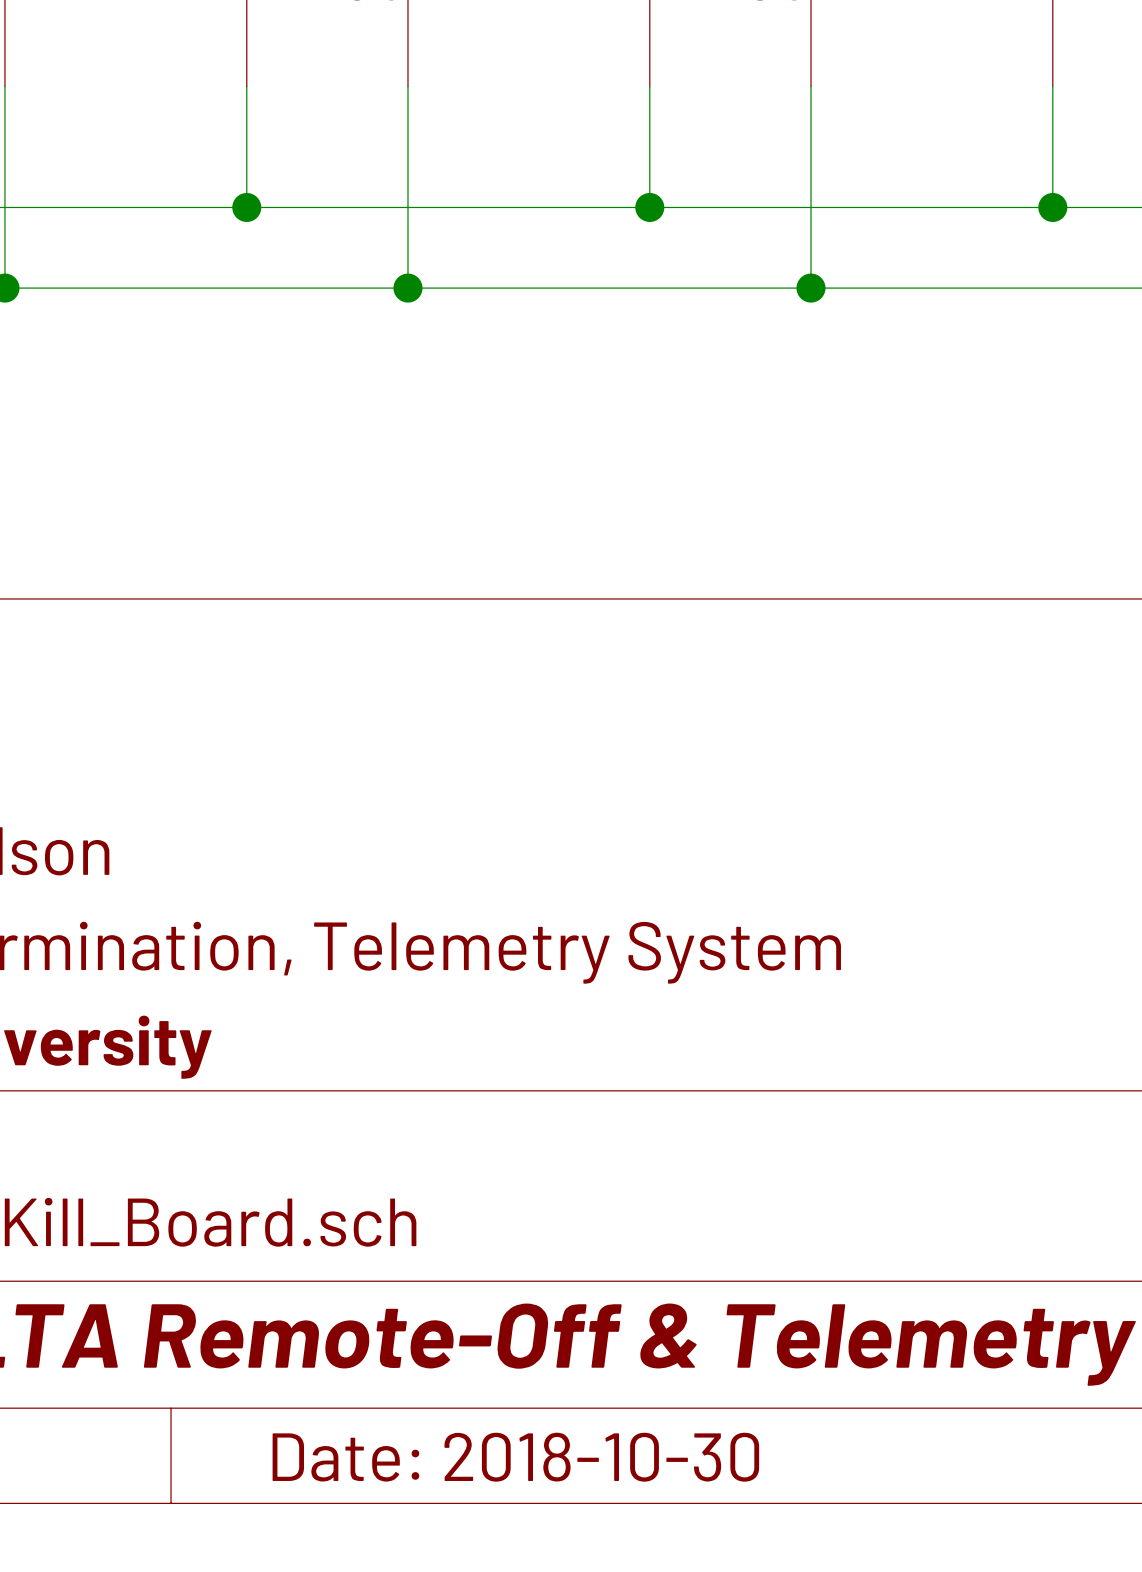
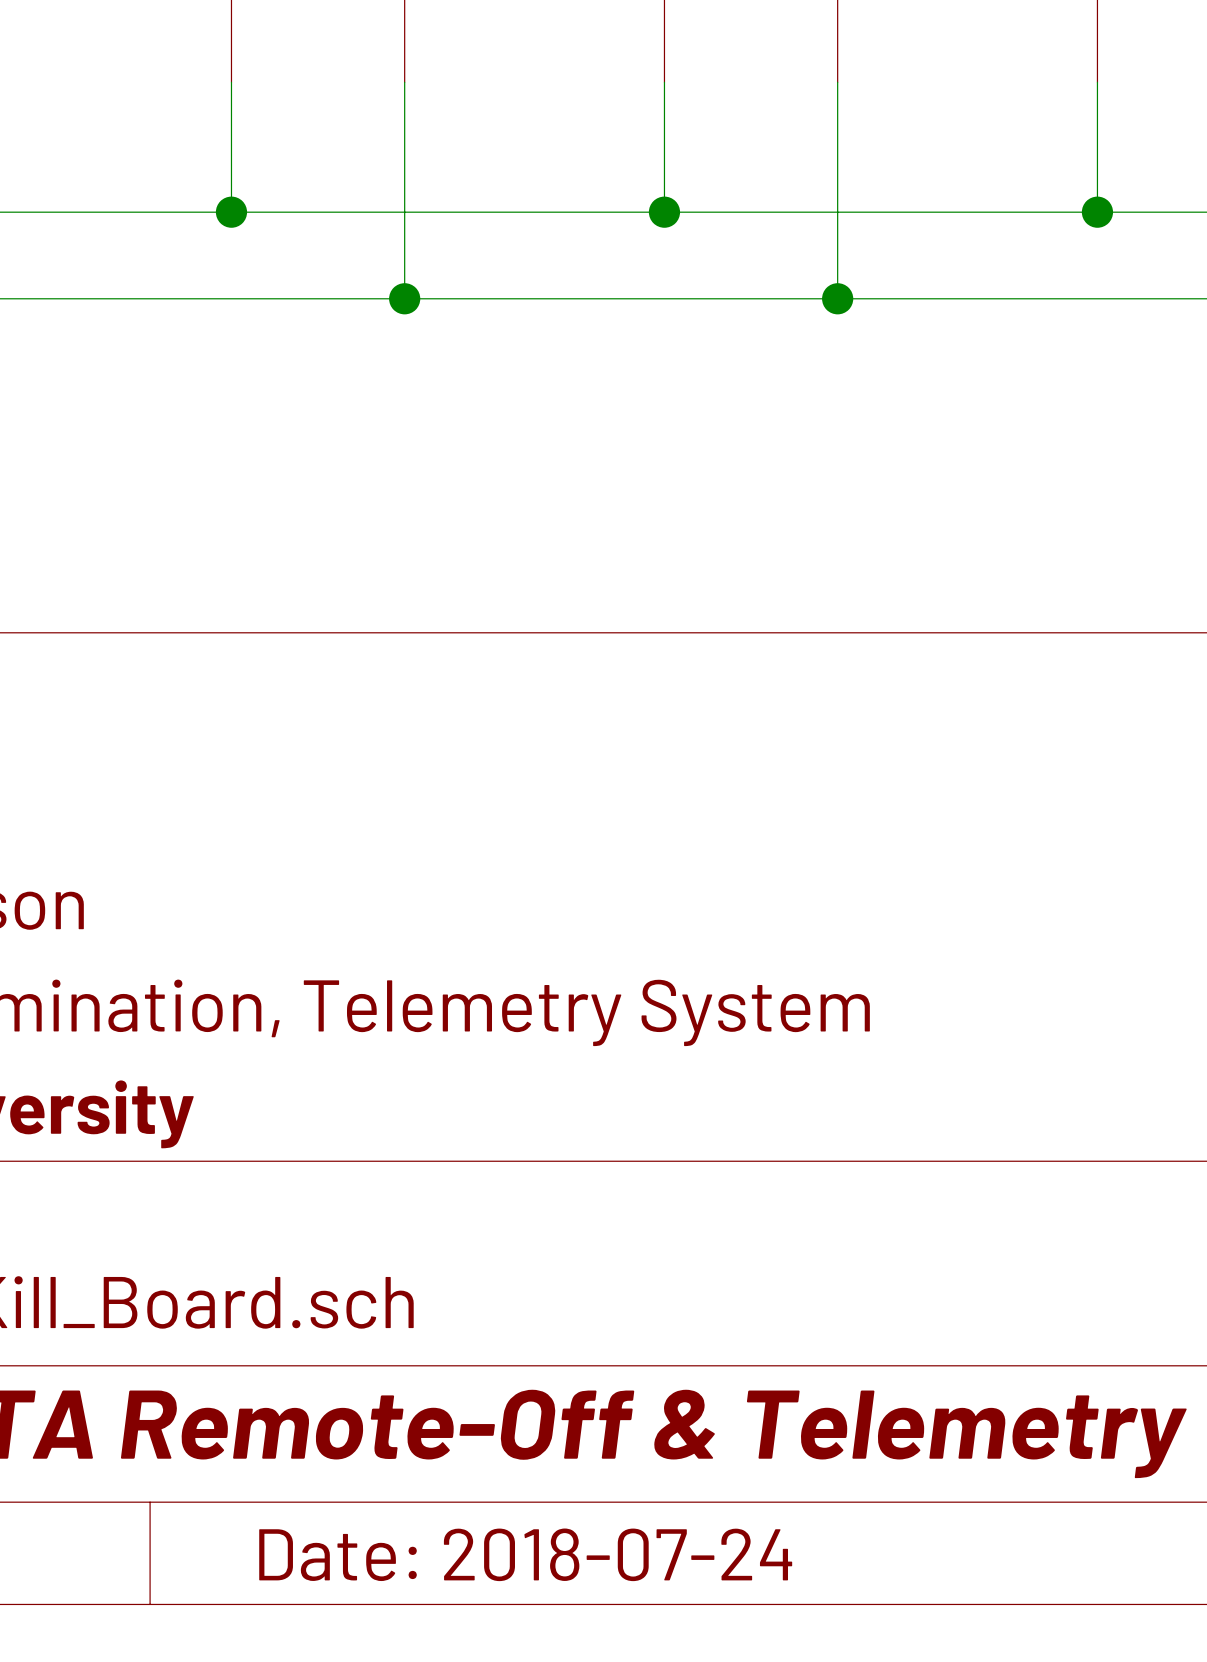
title block: Date: 2018-10-30 (515, 1457) -> Date: 2018-07-24 (525, 1554)

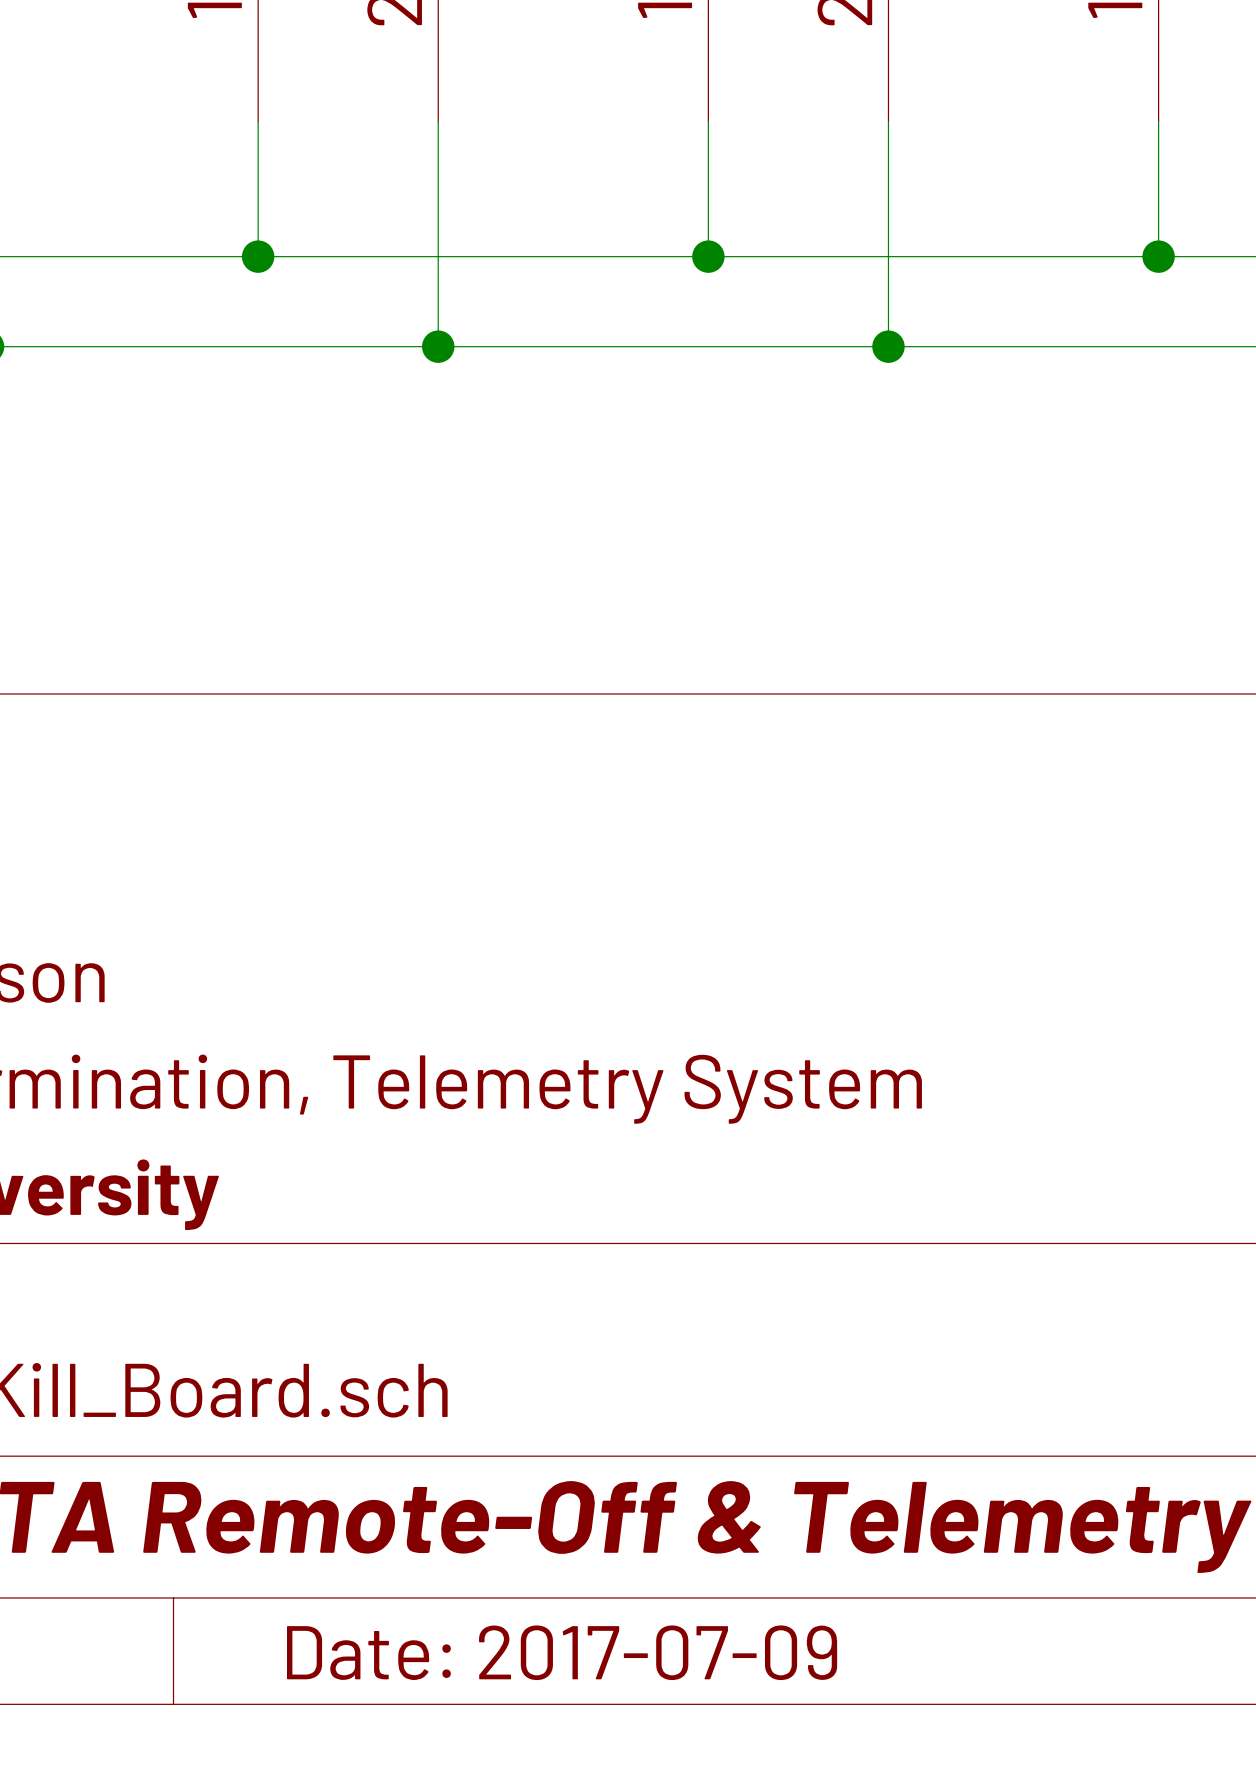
title block: Date: 2018-07-24 (525, 1554) -> Date: 2017-07-09 (562, 1652)

